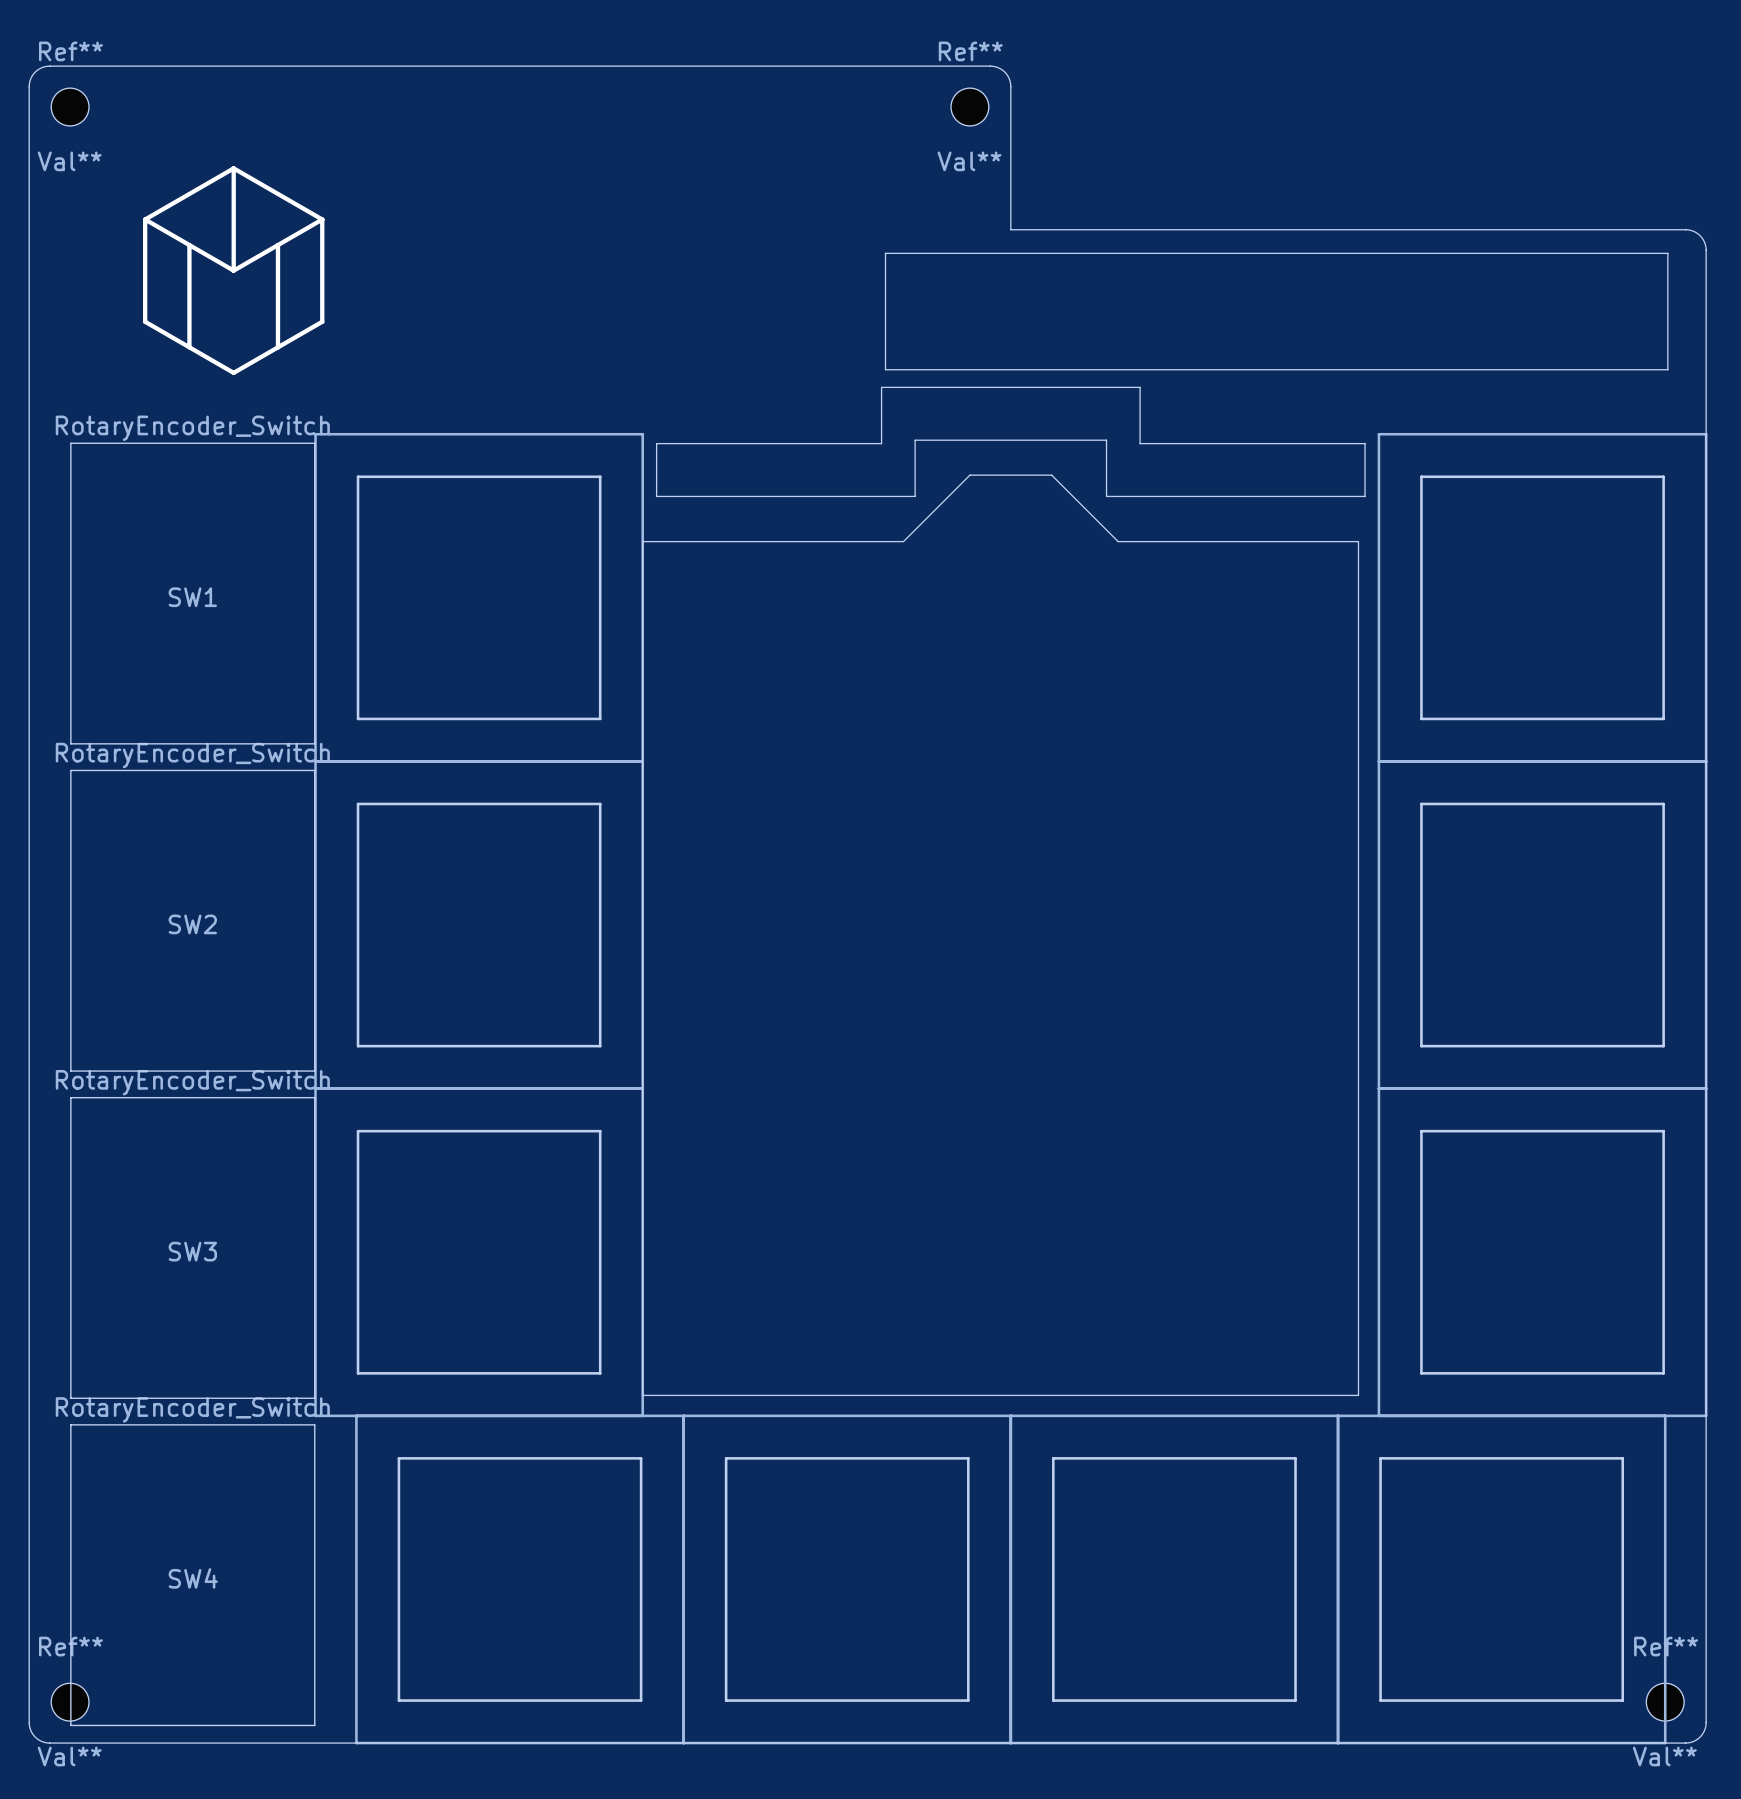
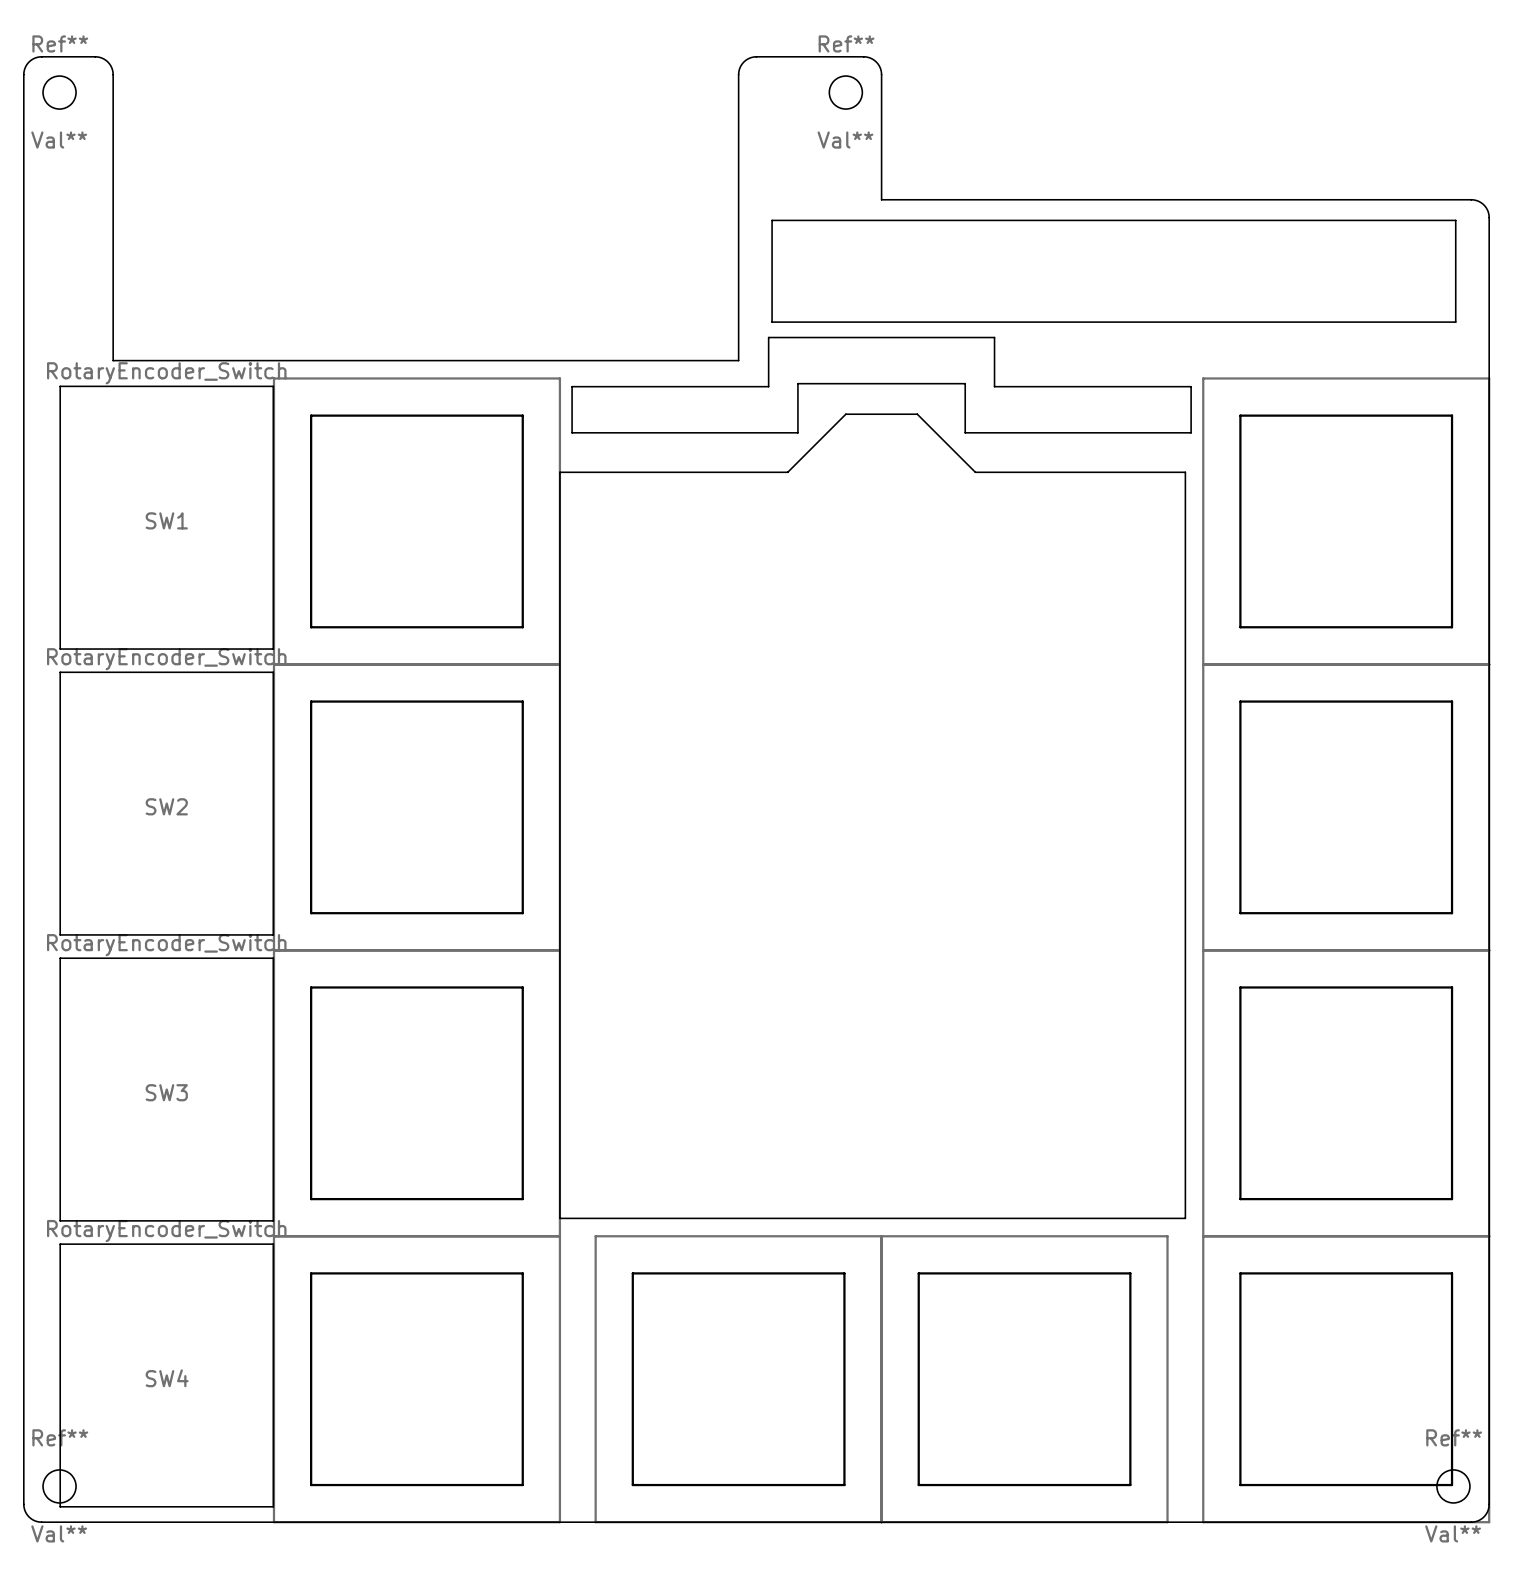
board edge: (111, 66) (867, 66) -> (95, 56) (107, 62) (113, 74) (113, 360) (738, 360) (738, 74) (743, 62) (756, 56)
drawing: [143, 166, 325, 376] -> none
drawing position: (520, 1579) -> (416, 1379)
drawing position: (1501, 1579) -> (1346, 1379)

